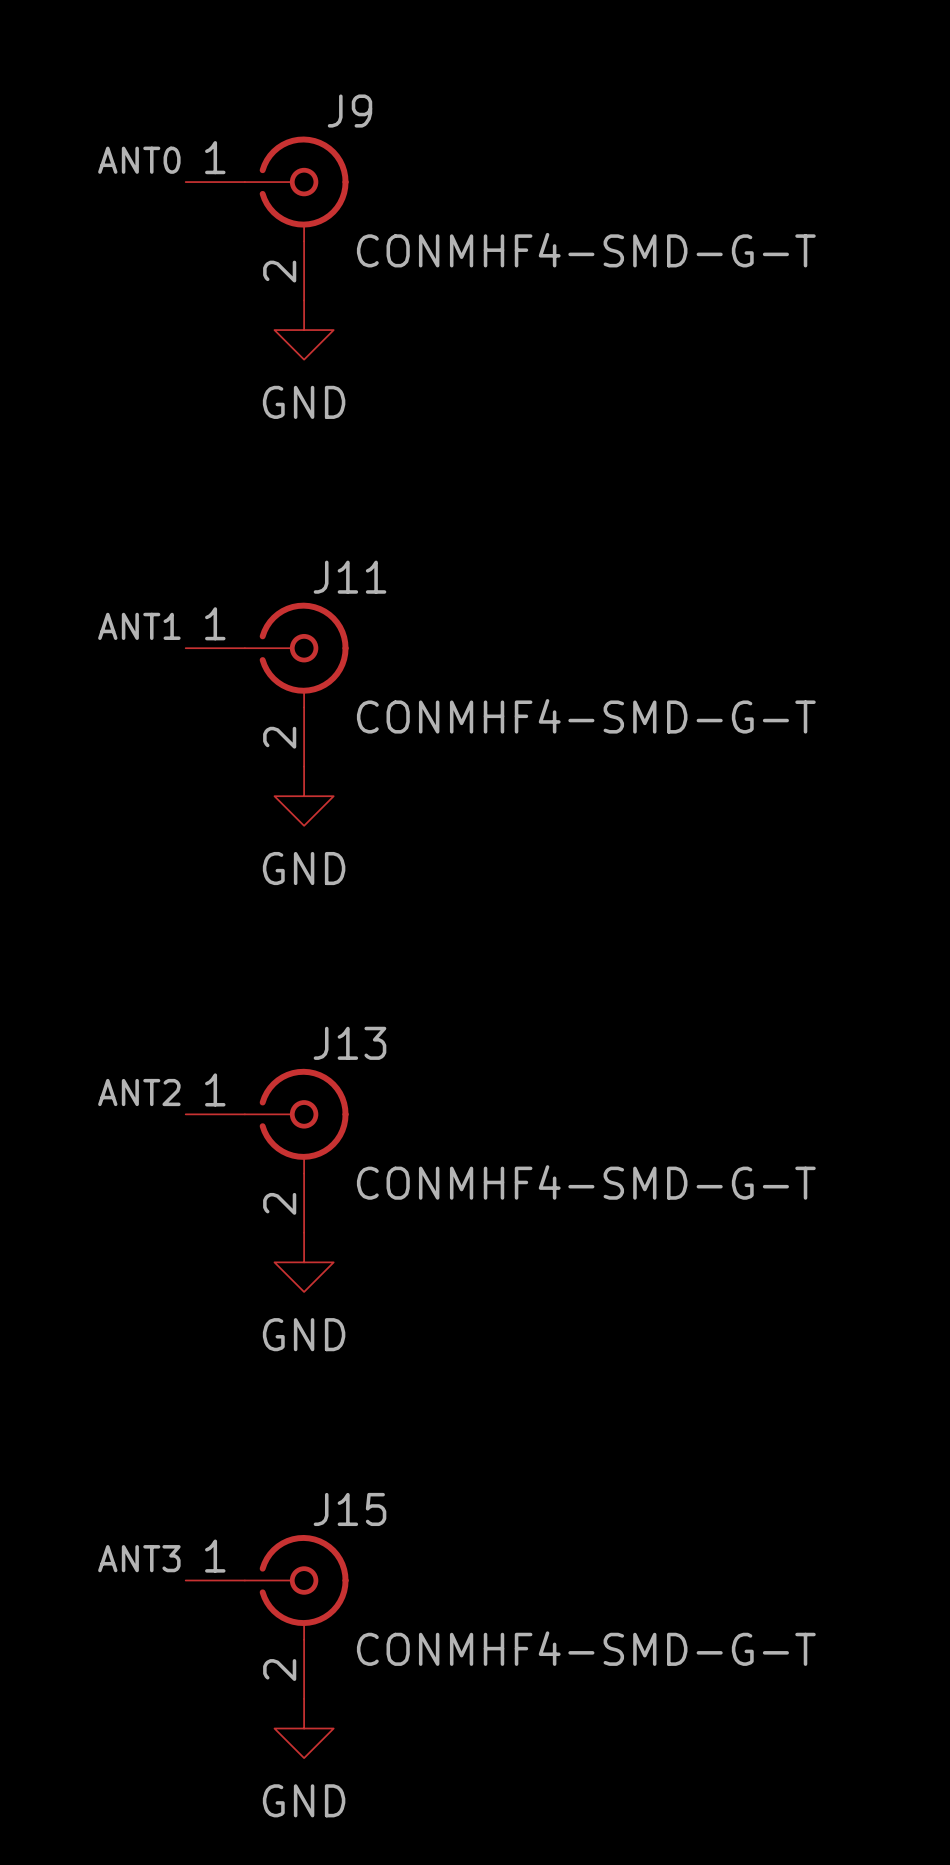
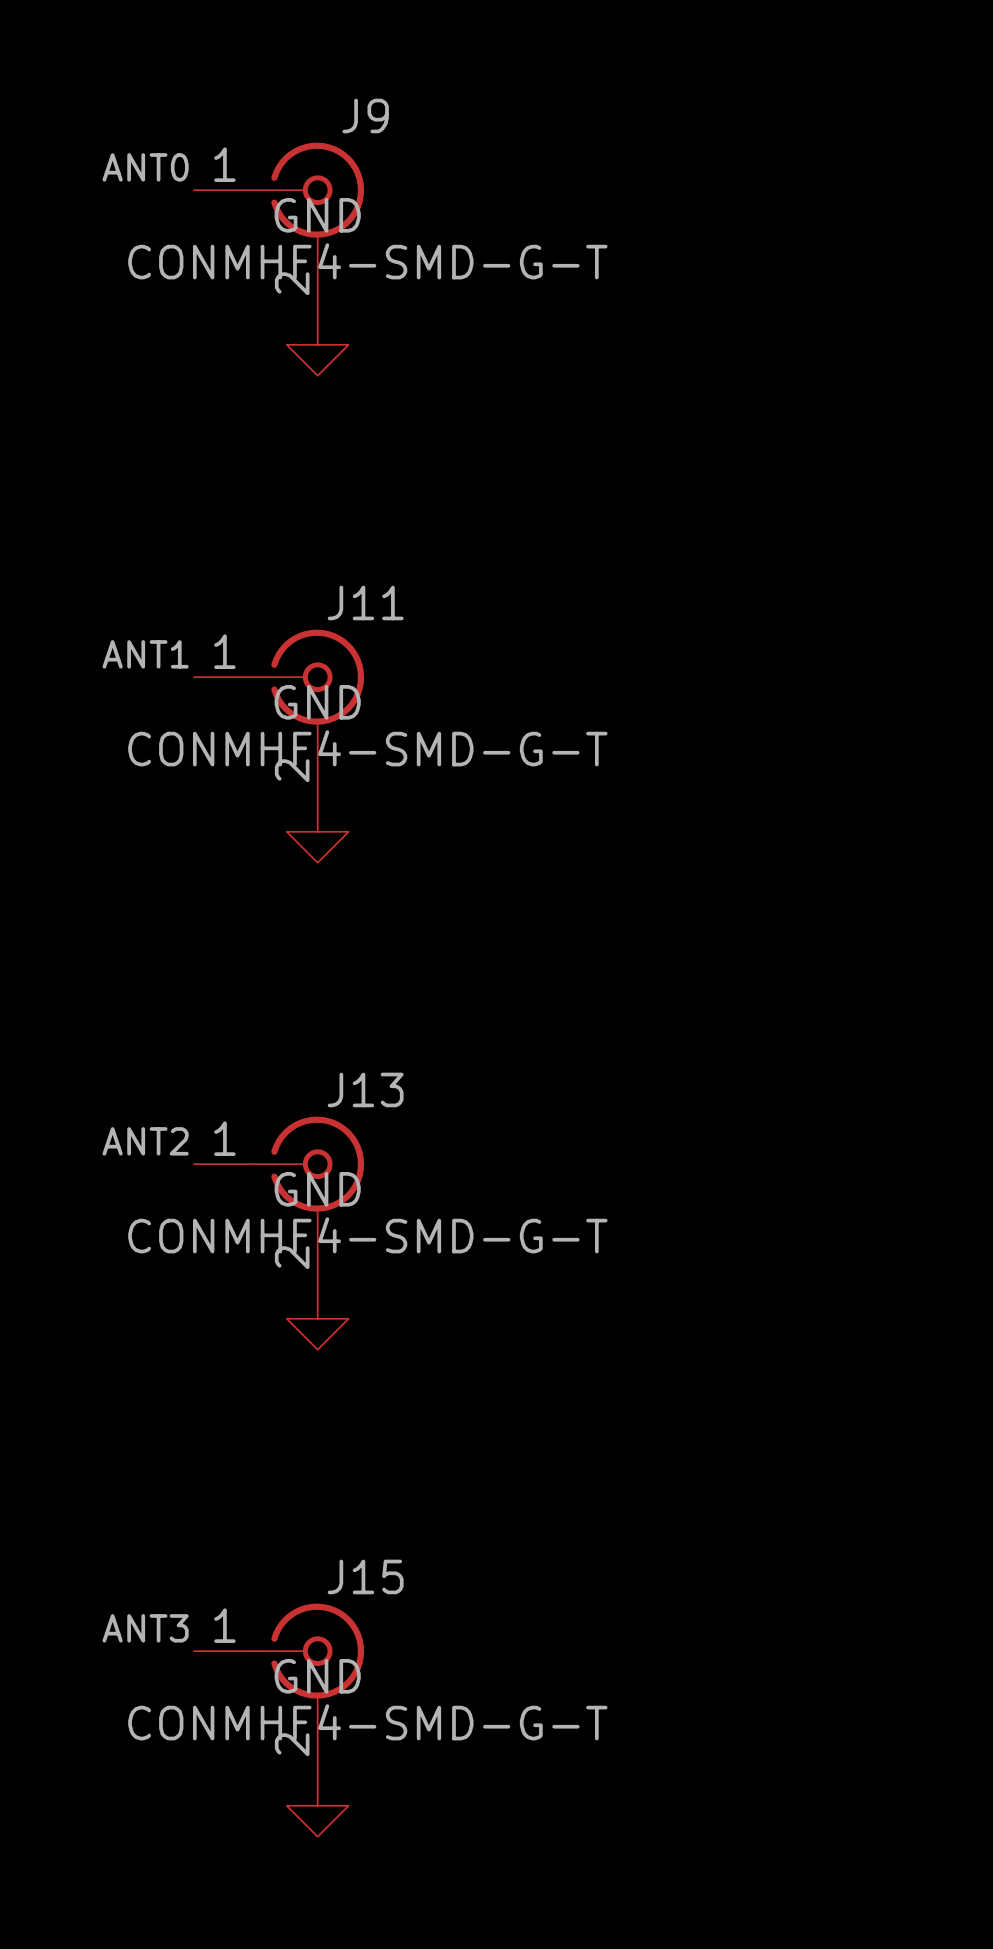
J9 value position: CONMHF4-SMD-G-T (586, 250) -> CONMHF4-SMD-G-T (367, 261)
power symbol text position: GND (304, 402) -> GND (317, 215)
J11 value position: CONMHF4-SMD-G-T (586, 716) -> CONMHF4-SMD-G-T (367, 748)
power symbol text position: GND (304, 868) -> GND (317, 702)
J13 value position: CONMHF4-SMD-G-T (586, 1182) -> CONMHF4-SMD-G-T (367, 1235)
power symbol text position: GND (304, 1334) -> GND (317, 1189)
J15 value position: CONMHF4-SMD-G-T (586, 1648) -> CONMHF4-SMD-G-T (367, 1722)
power symbol text position: GND (304, 1800) -> GND (317, 1676)

